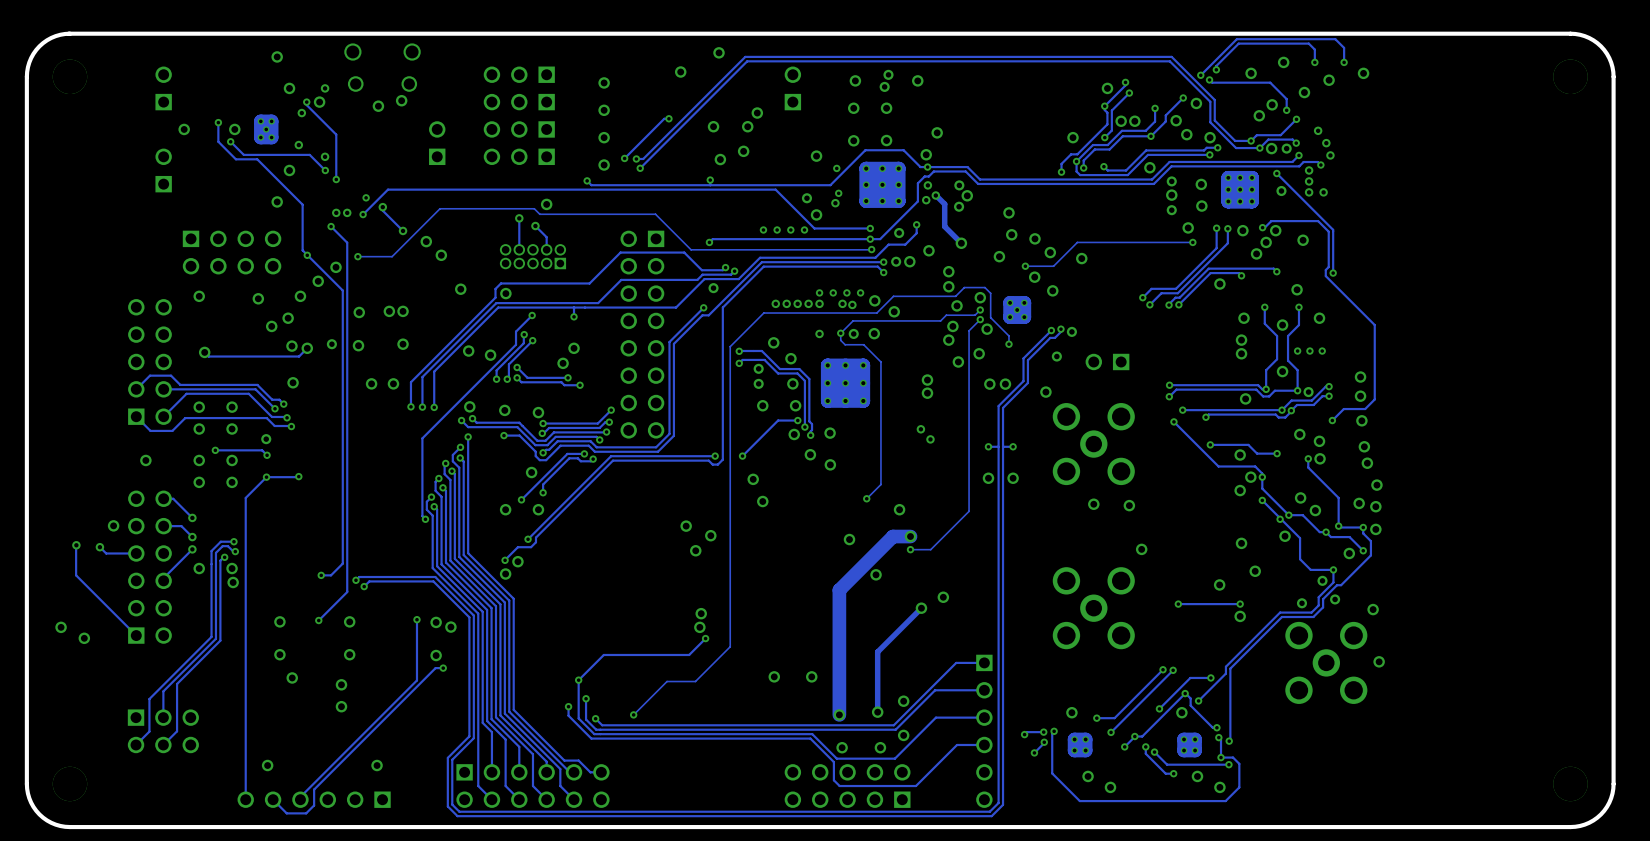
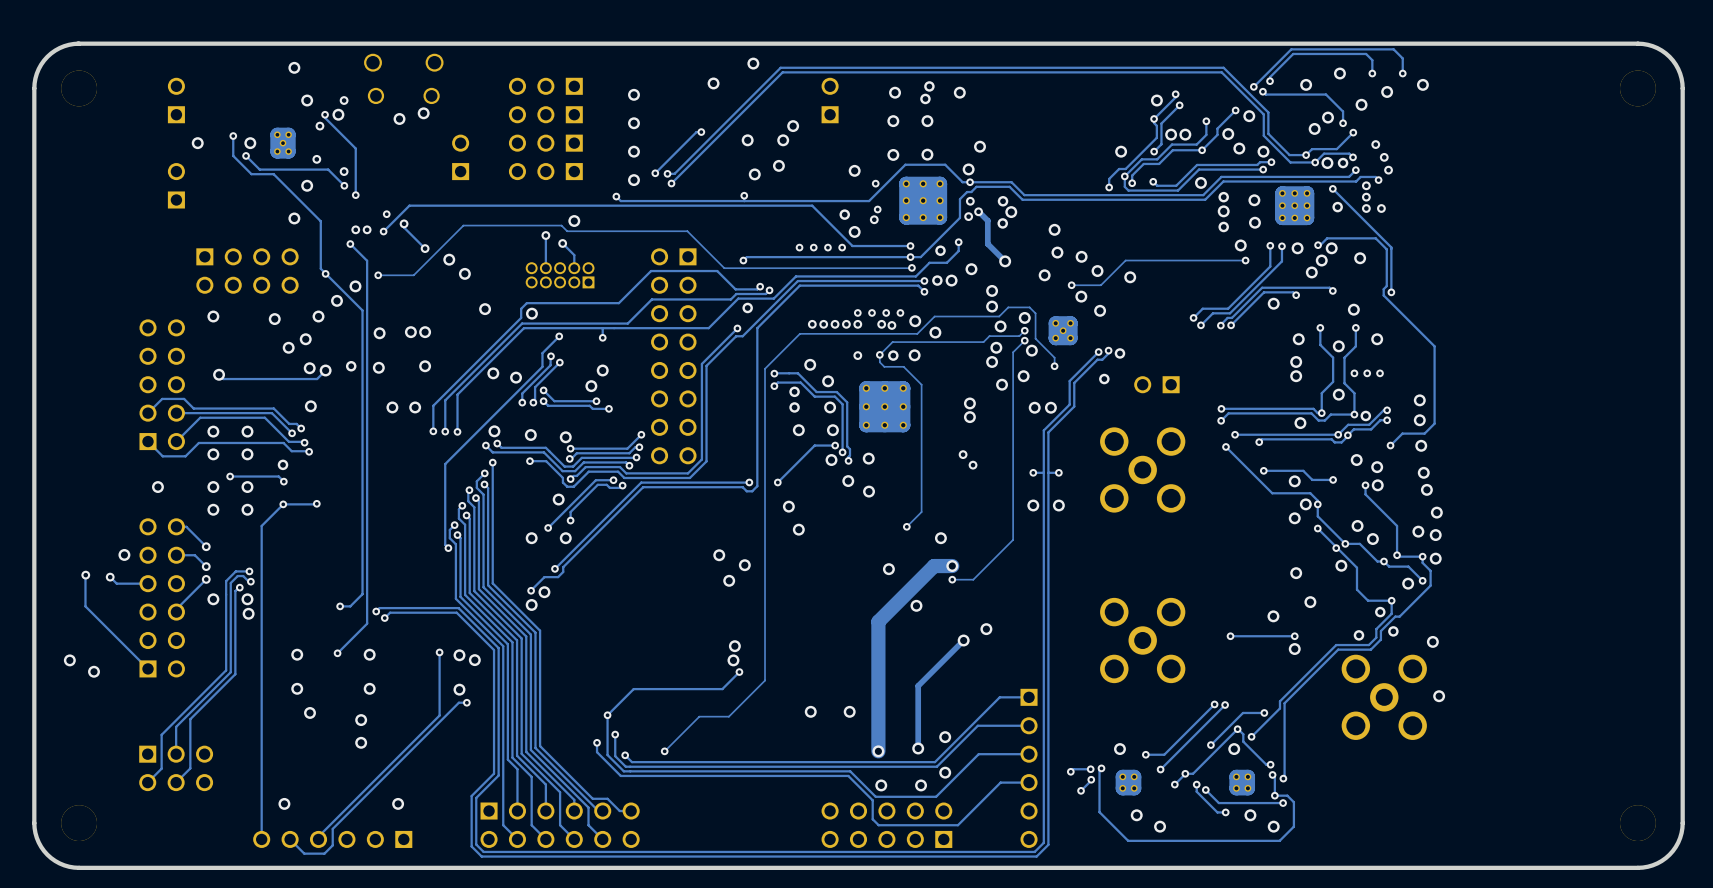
via: (1045, 392) -> none
via: (1093, 504) -> none
via: (1129, 505) -> none
via: (1141, 549) -> none

